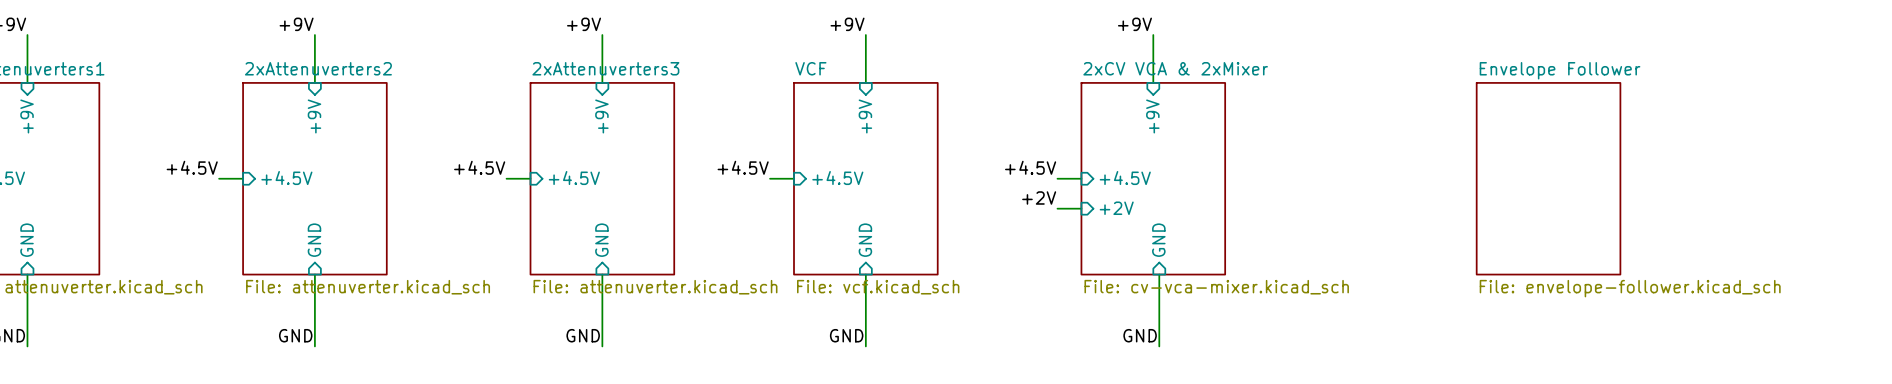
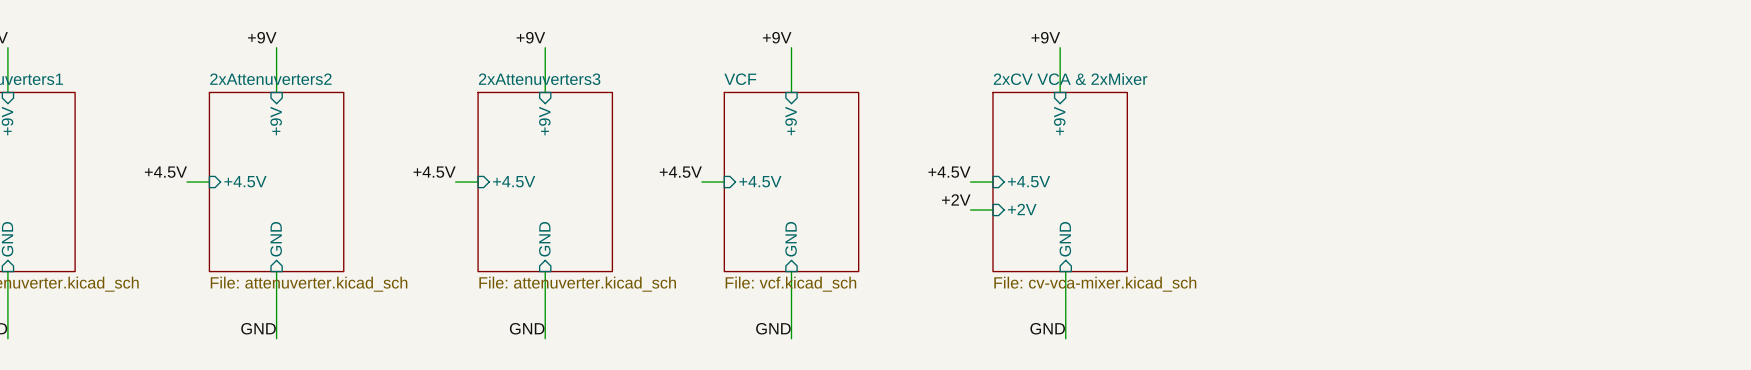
sheet Envelope Follower: File: envelope-follower.kicad_sch (1548, 178) -> none

